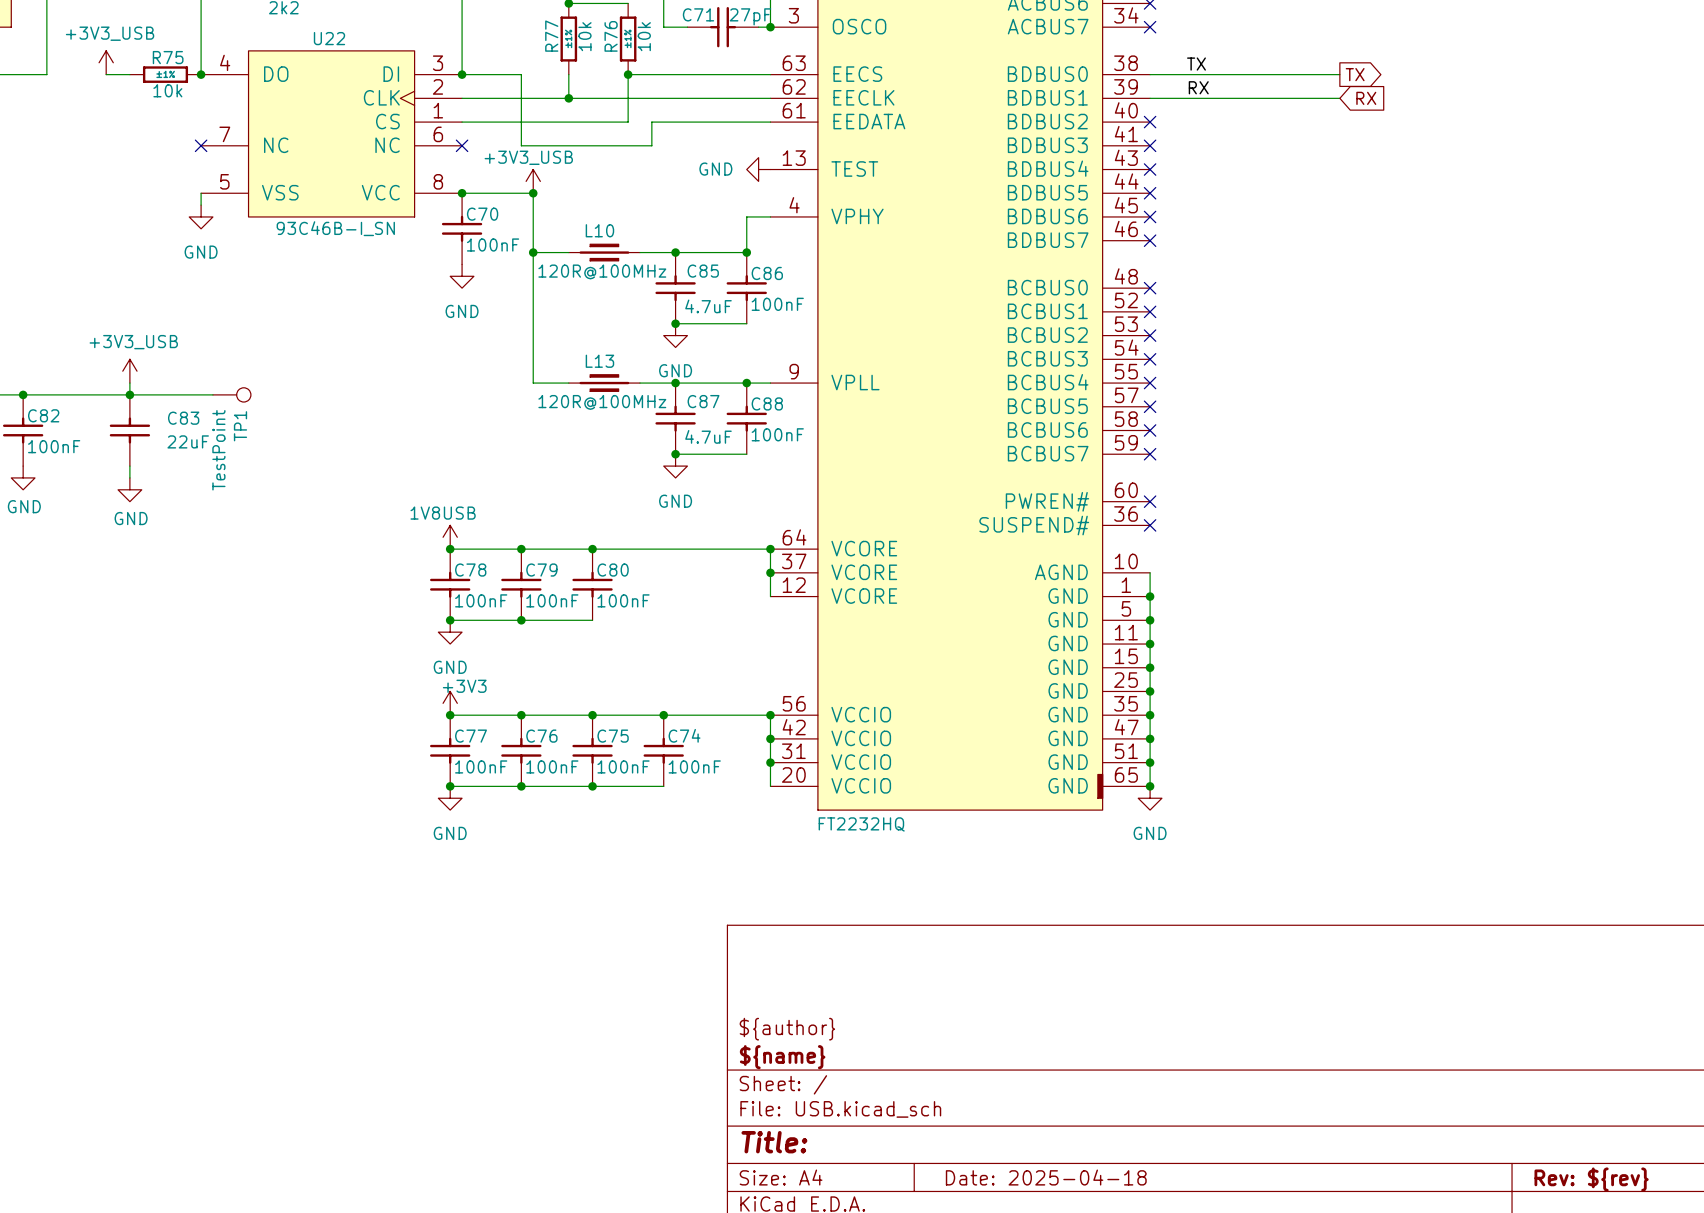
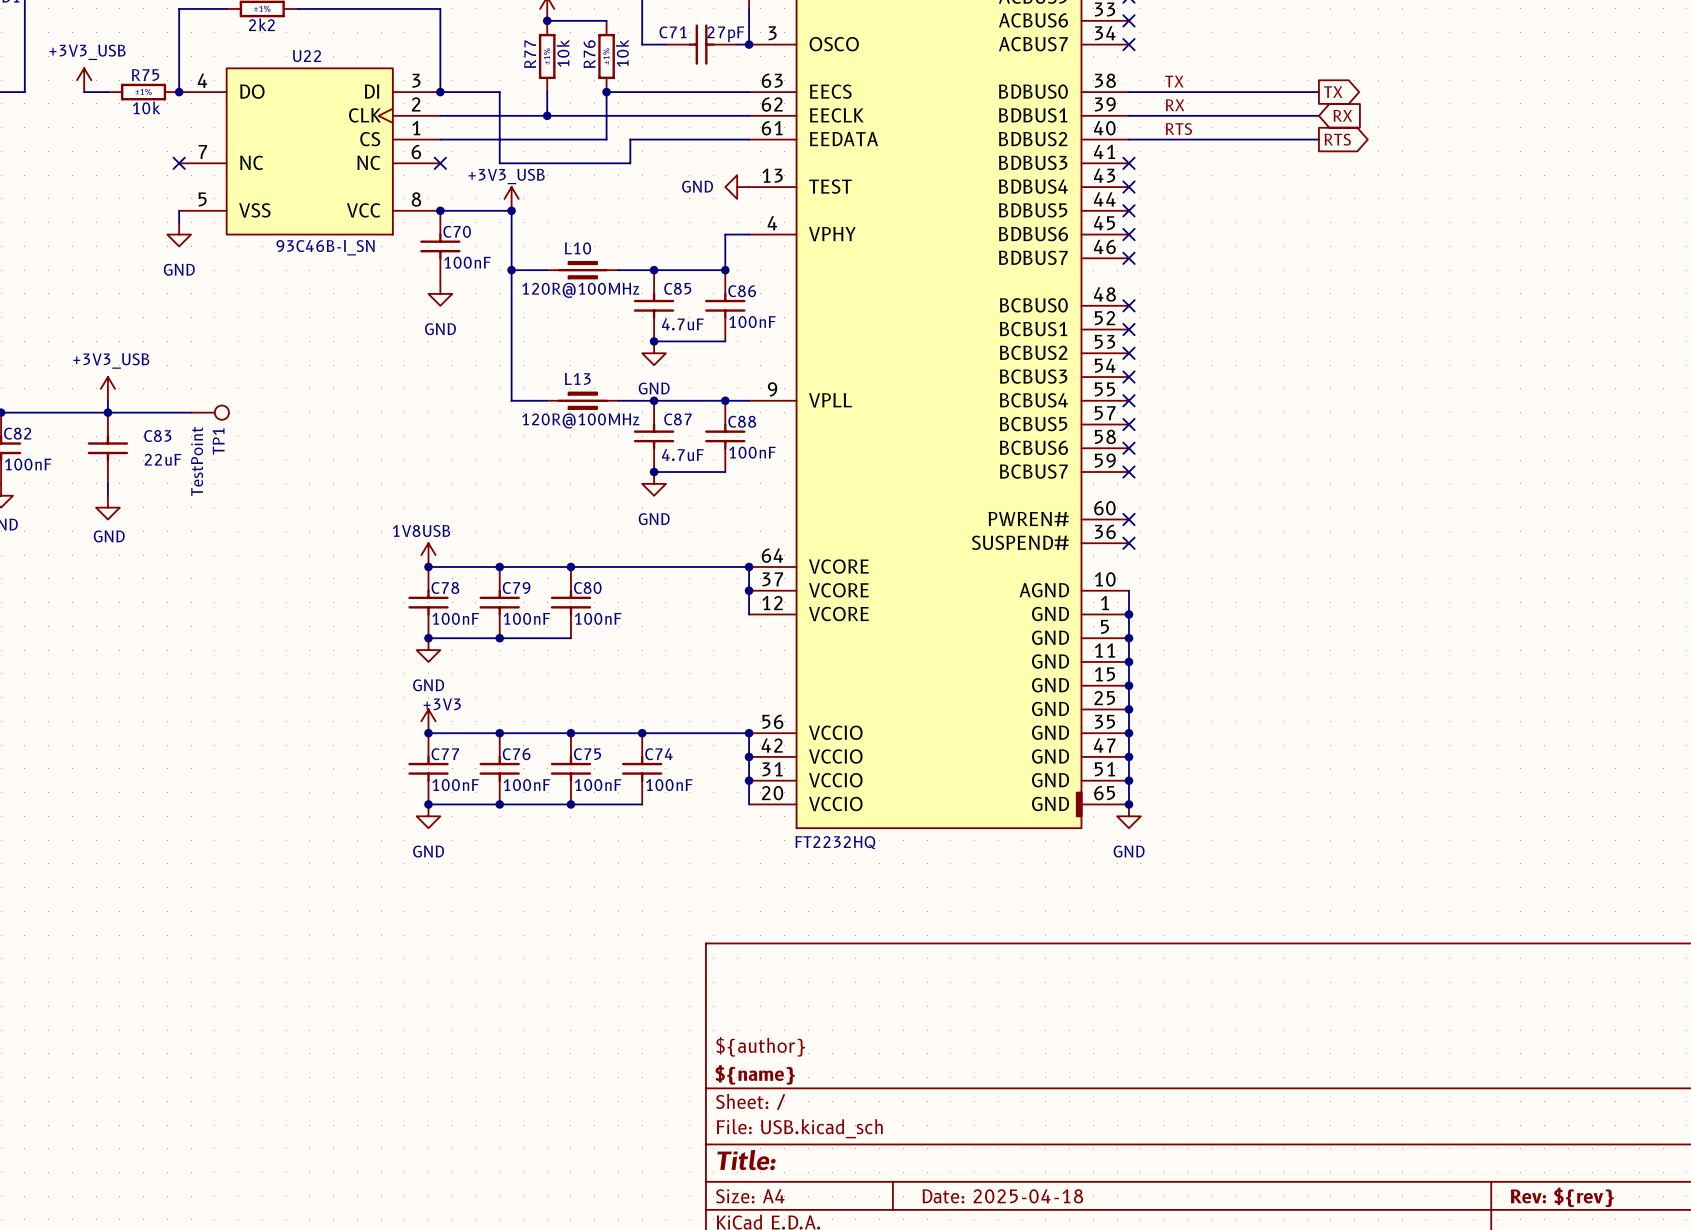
label: none -> RTS (1178, 129)
wire: none -> (1128, 139) (1318, 139)
no-connect mark: (1150, 122) -> none
global label: none -> RTS (1337, 139)

